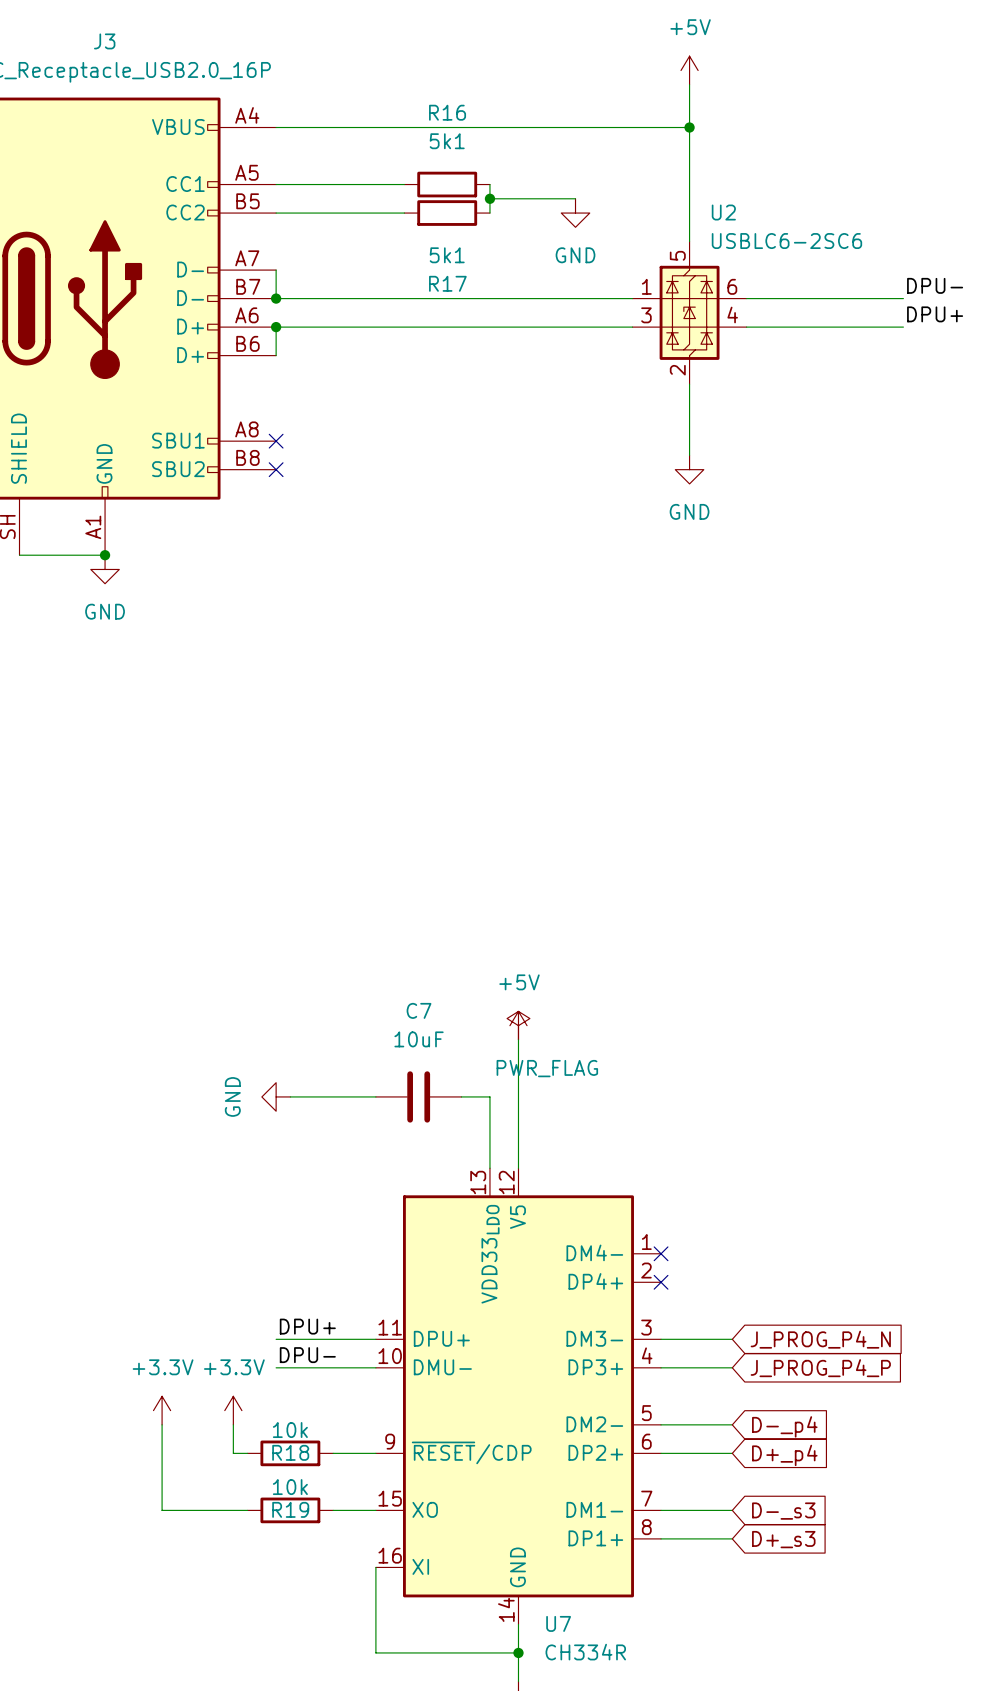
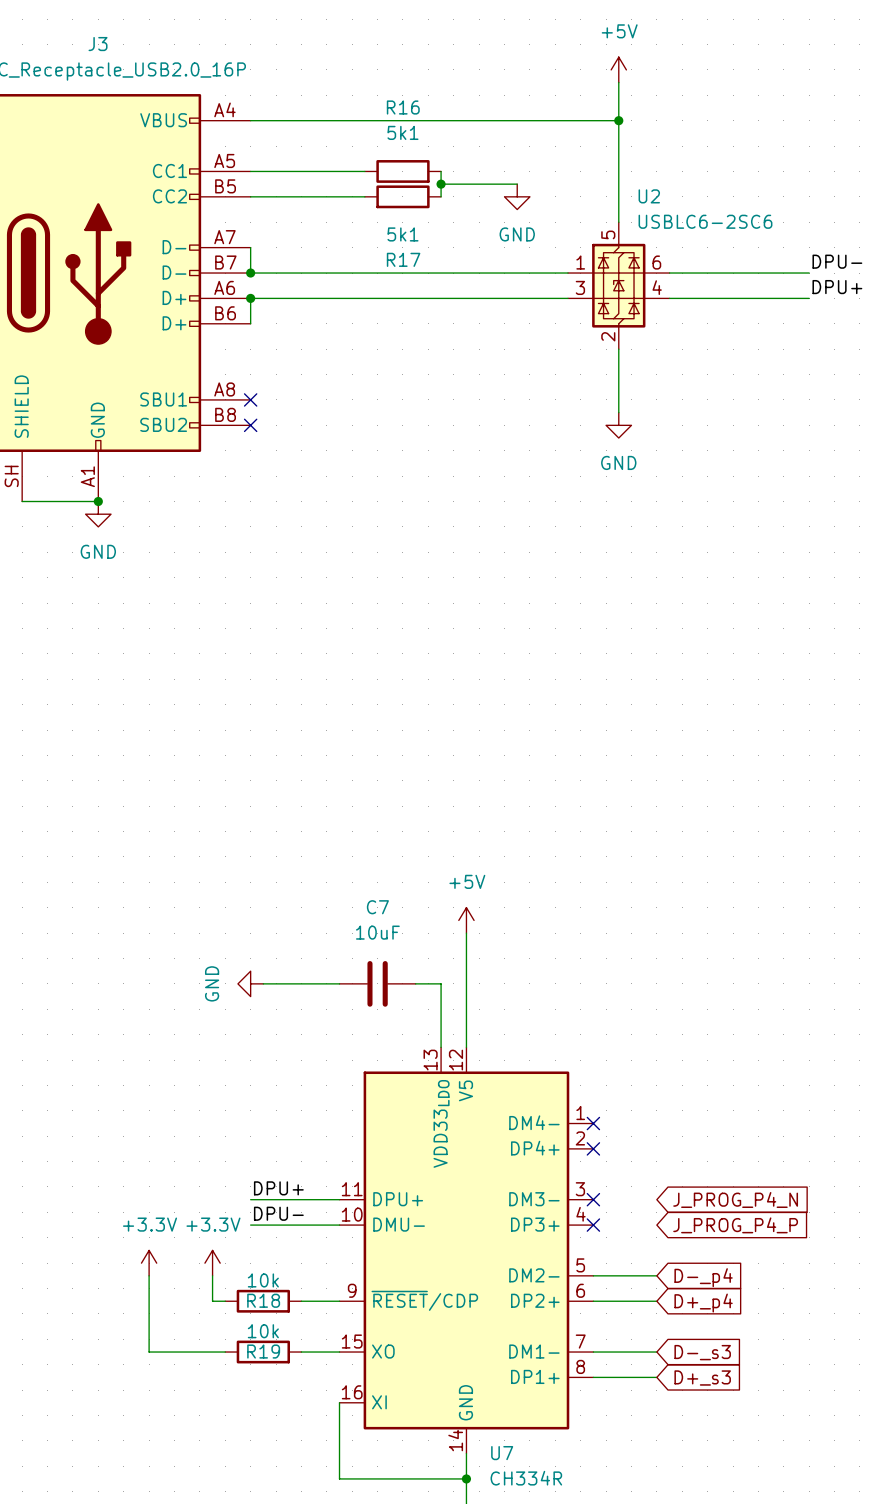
power symbol: PWR_FLAG (518, 1025) -> none
wire: (661, 1339) (732, 1339) -> none
no-connect mark: none -> (593, 1199)
wire: (661, 1367) (732, 1367) -> none
no-connect mark: none -> (593, 1225)

